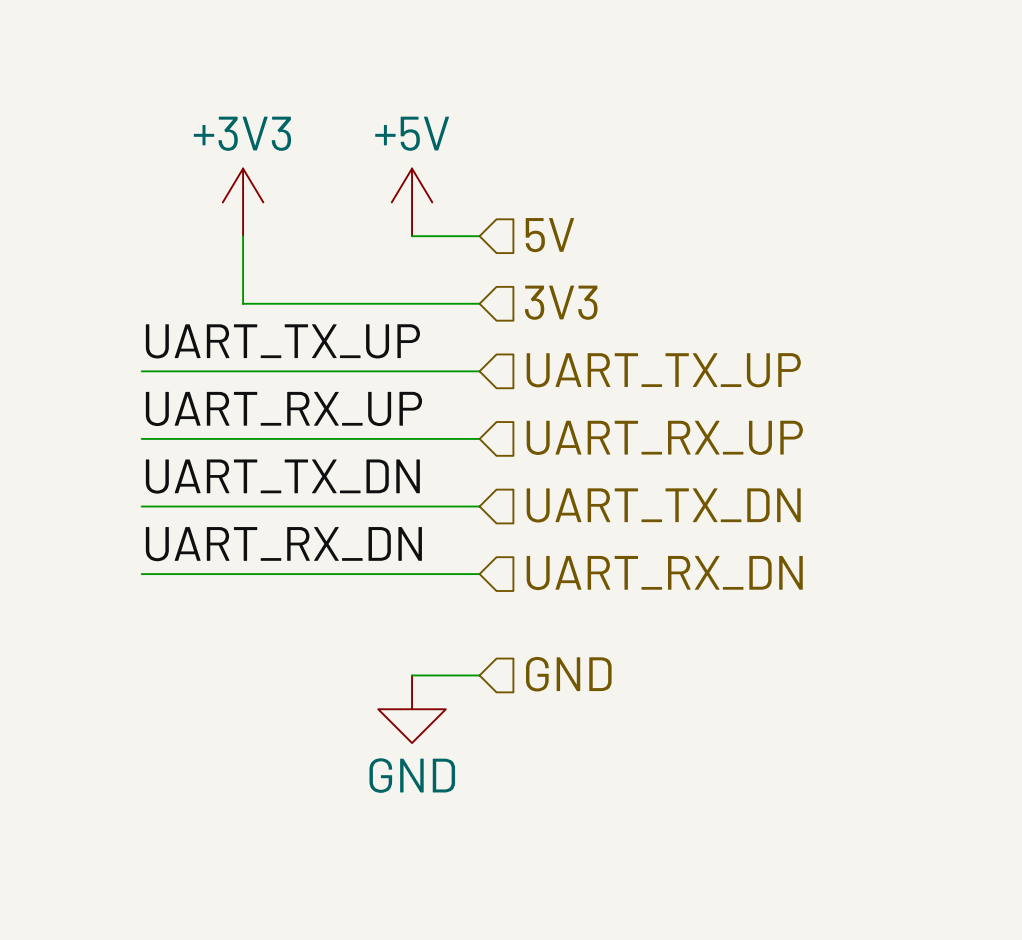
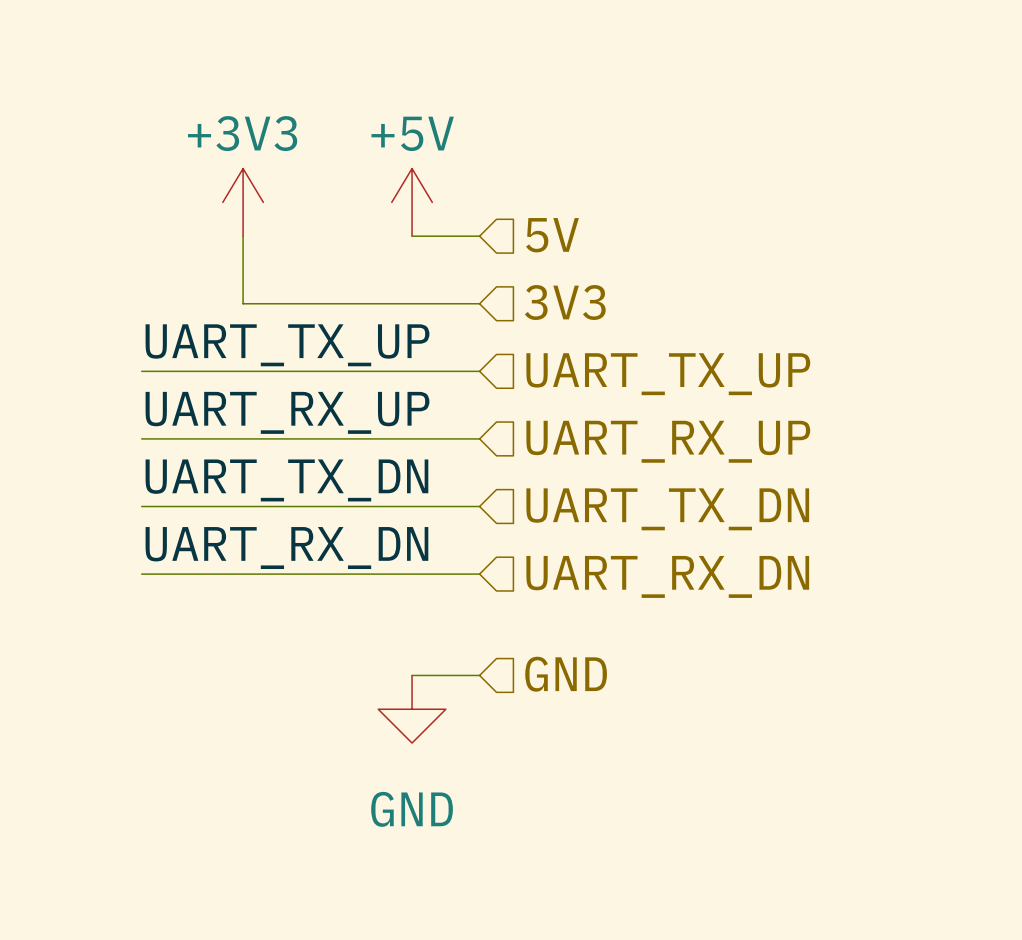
power symbol text position: GND (412, 775) -> GND (412, 809)

